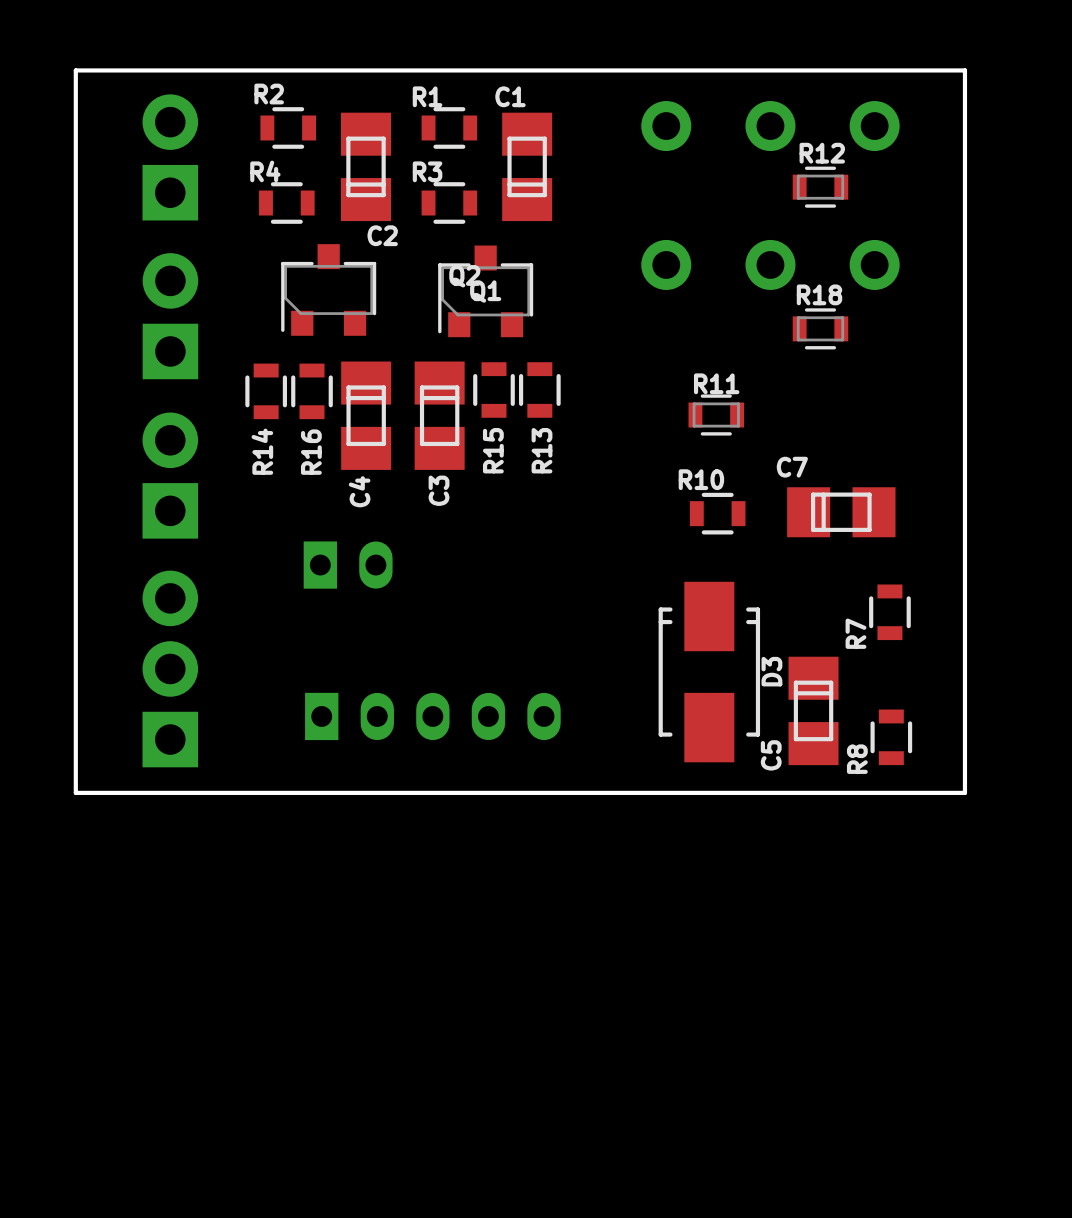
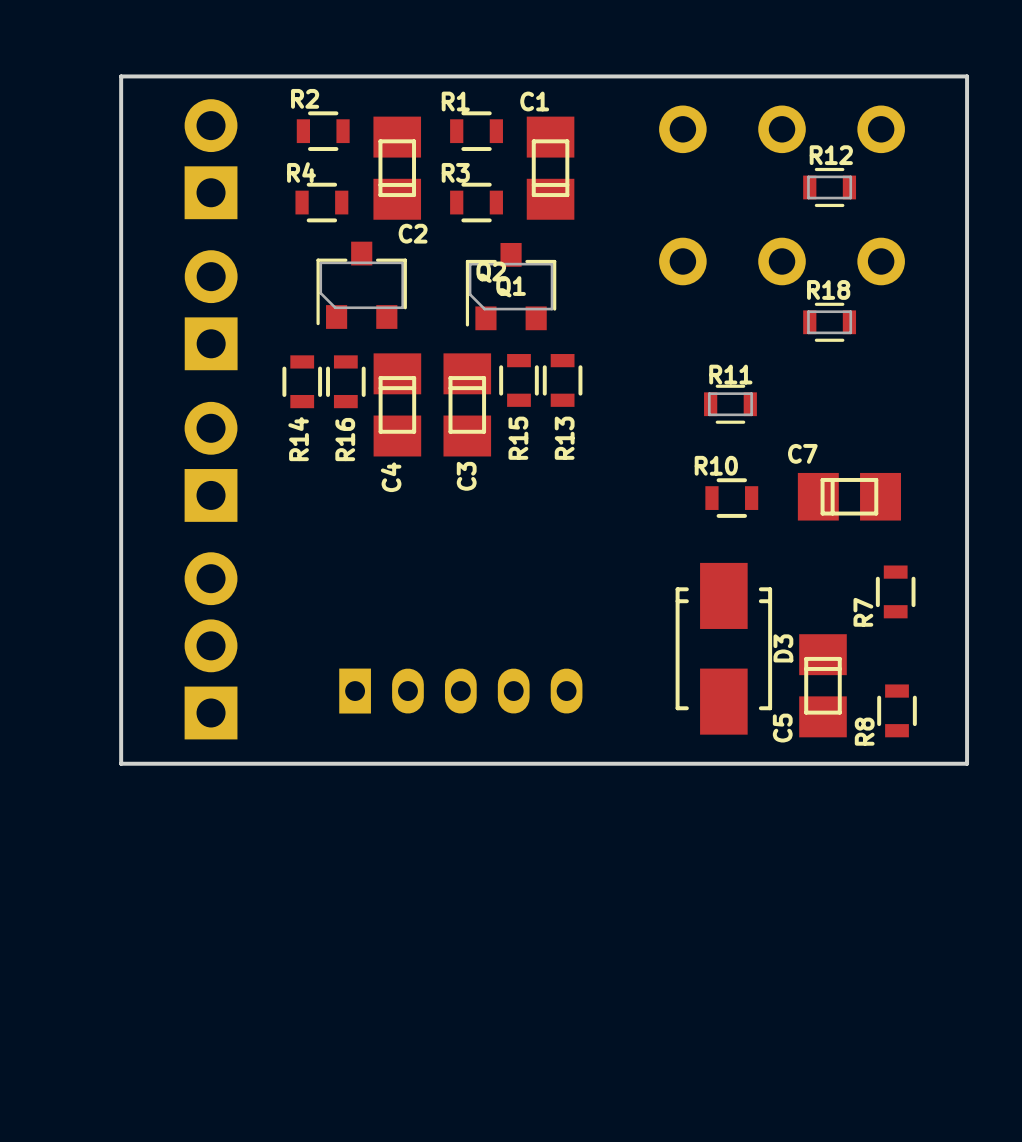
part: (348, 565) -> none

